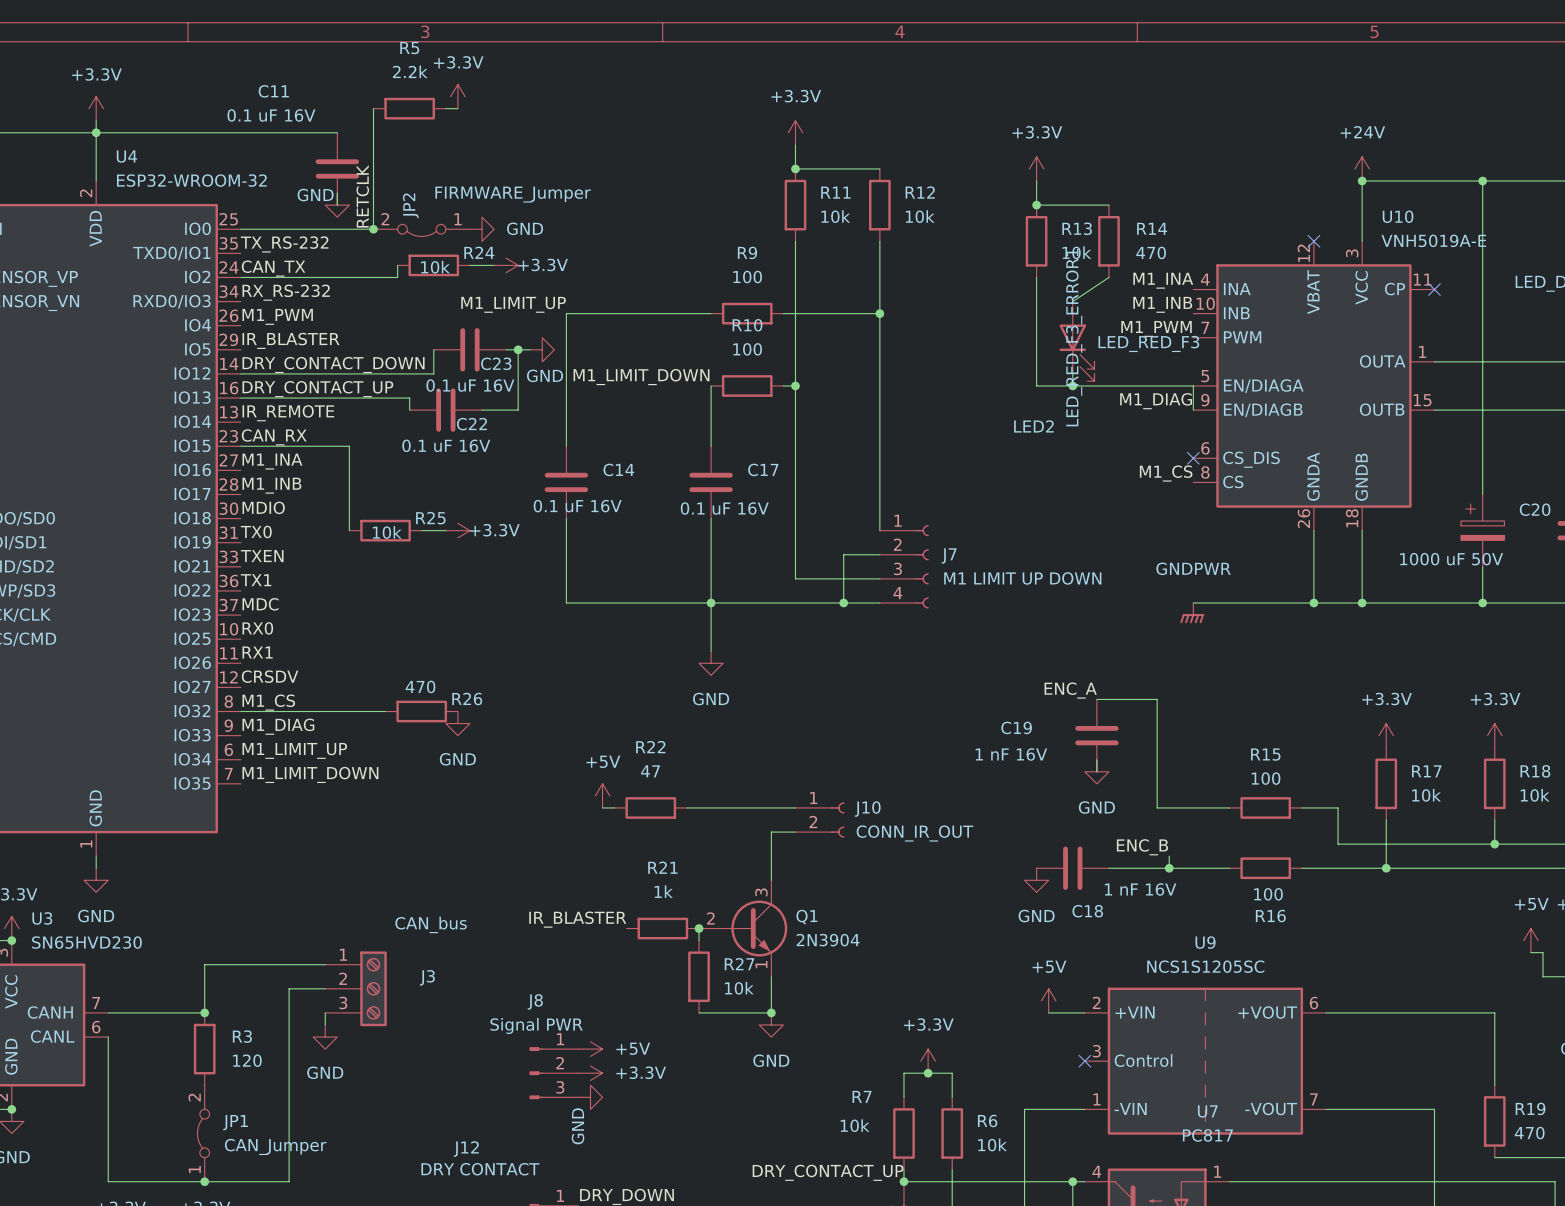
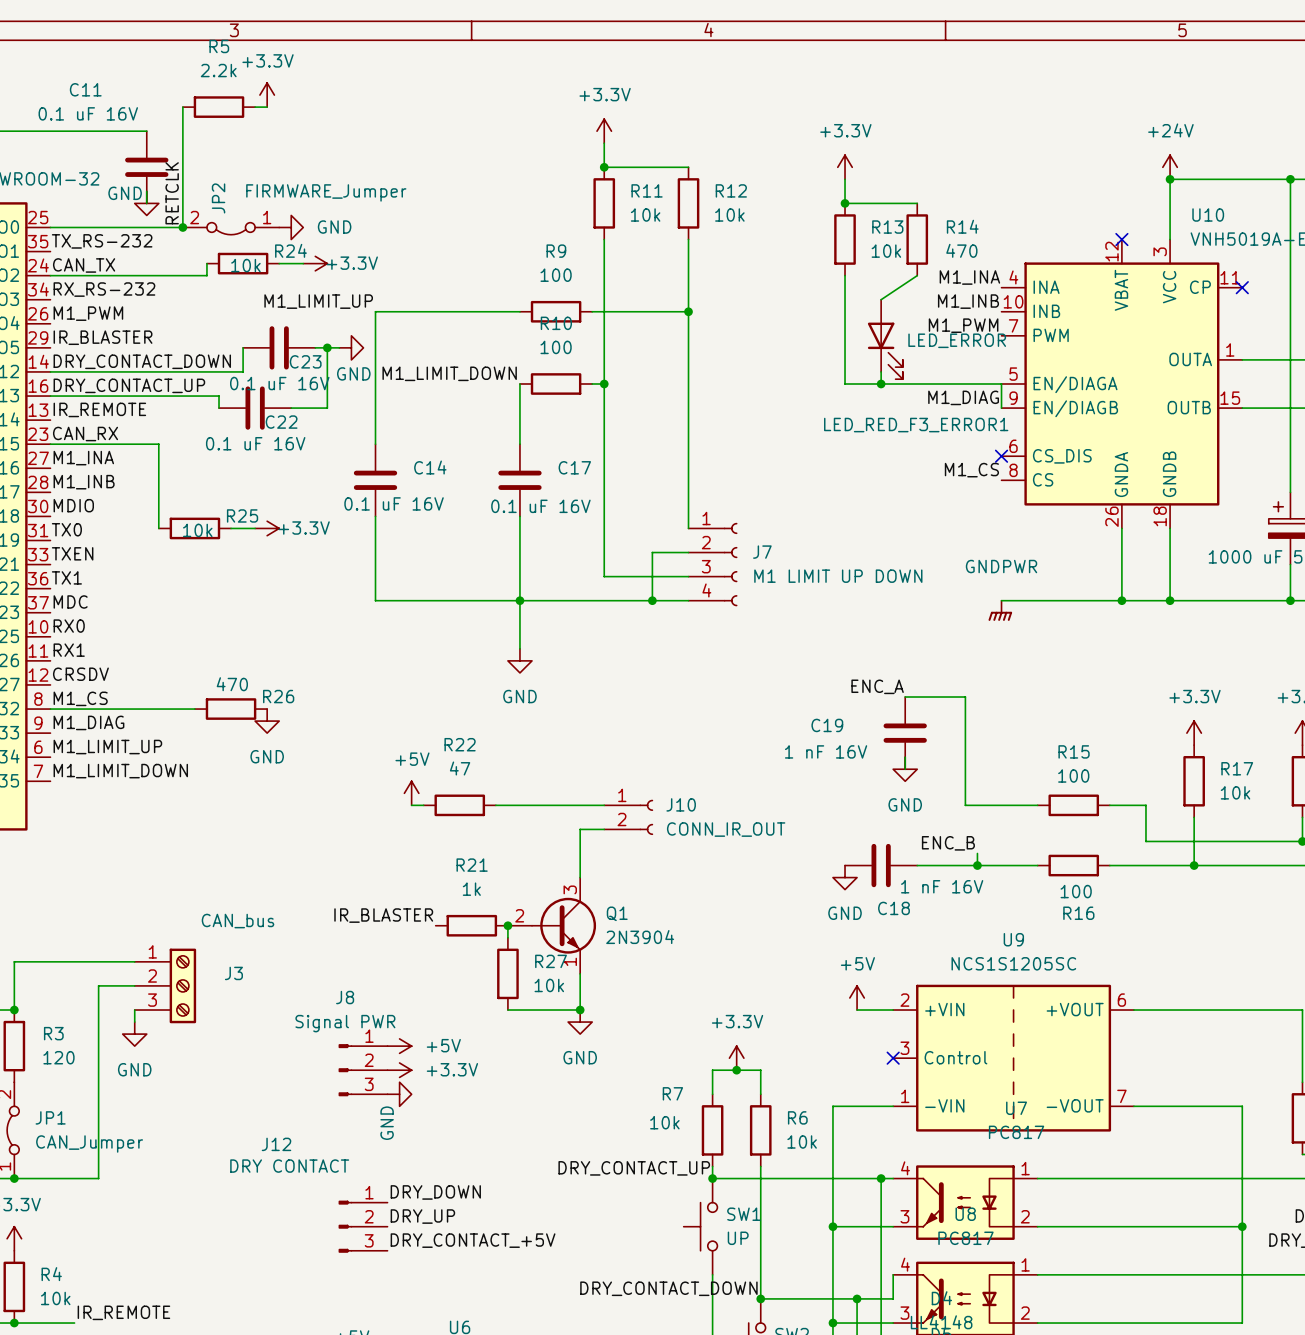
LED2 text: LED_RED_F3_ERROR1 (1074, 337) -> none
LED2 value: LED_RED_F3 (1148, 343) -> LED_ERROR (957, 340)
LED2 name: LED2 (1033, 426) -> LED_RED_F3_ERROR1 (916, 425)

